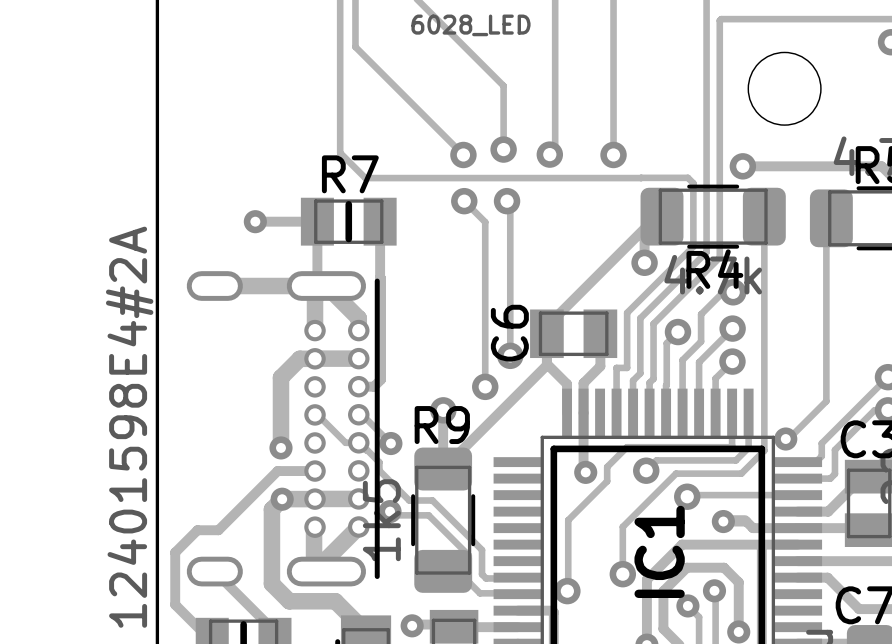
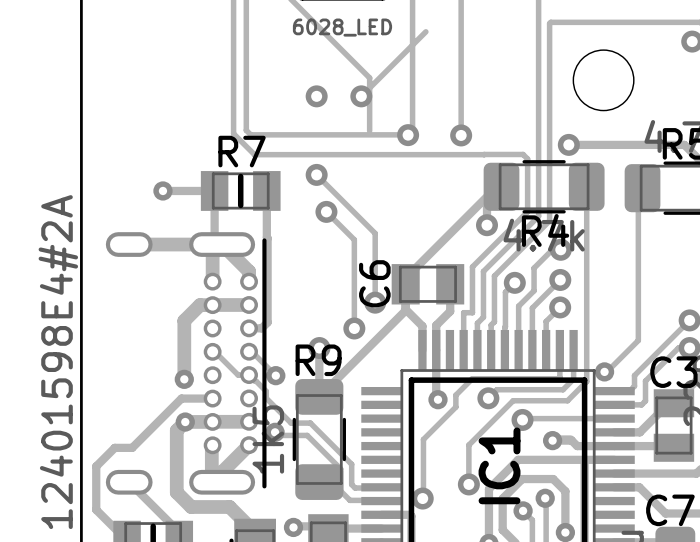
track: none -> (425, 31) (361, 96)
track: (355, 47) (463, 154) -> (246, 45) (246, 130) (250, 134) (407, 134)
via: none -> (316, 96)
via: none -> (361, 96)
via: (503, 149) -> none
via: (463, 154) -> none
track: (464, 201) (485, 222) (485, 280) -> (326, 211) (354, 239)
via position: (464, 201) -> (316, 174)
track: (507, 201) (510, 204) (510, 272) -> (316, 174) (375, 233)
via: (507, 201) -> none
via: none -> (326, 211)

